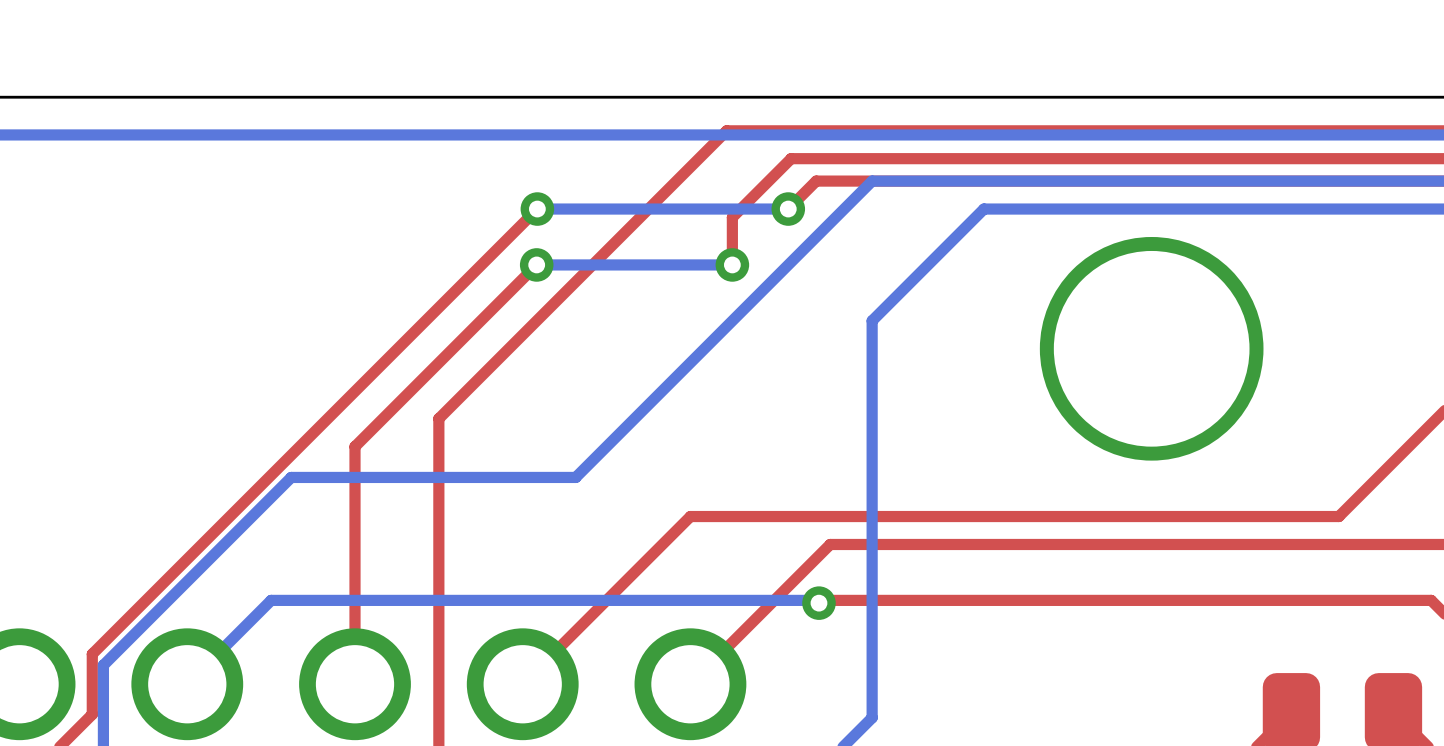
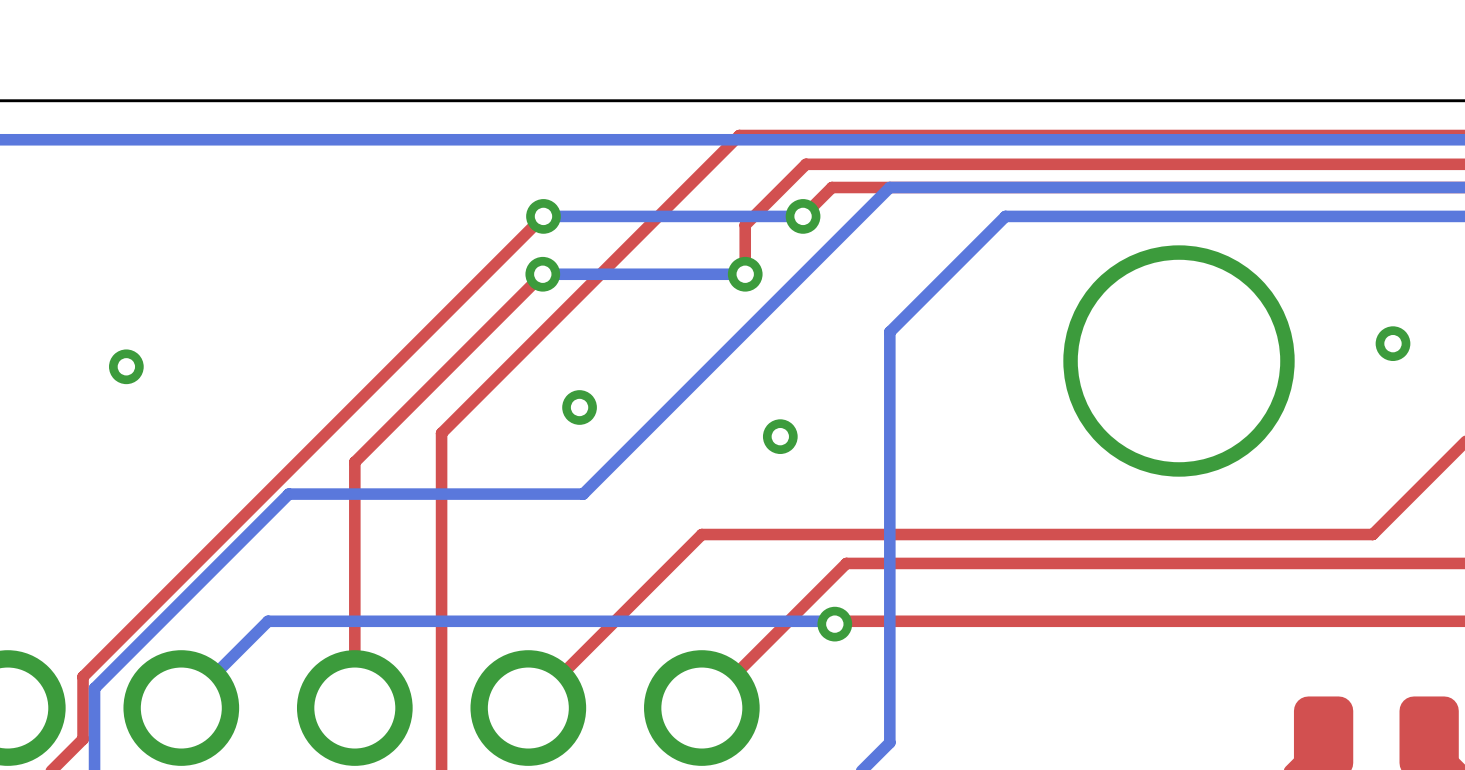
via: none -> (1393, 343)
via: none -> (126, 366)
via: none -> (579, 407)
via: none -> (780, 436)

